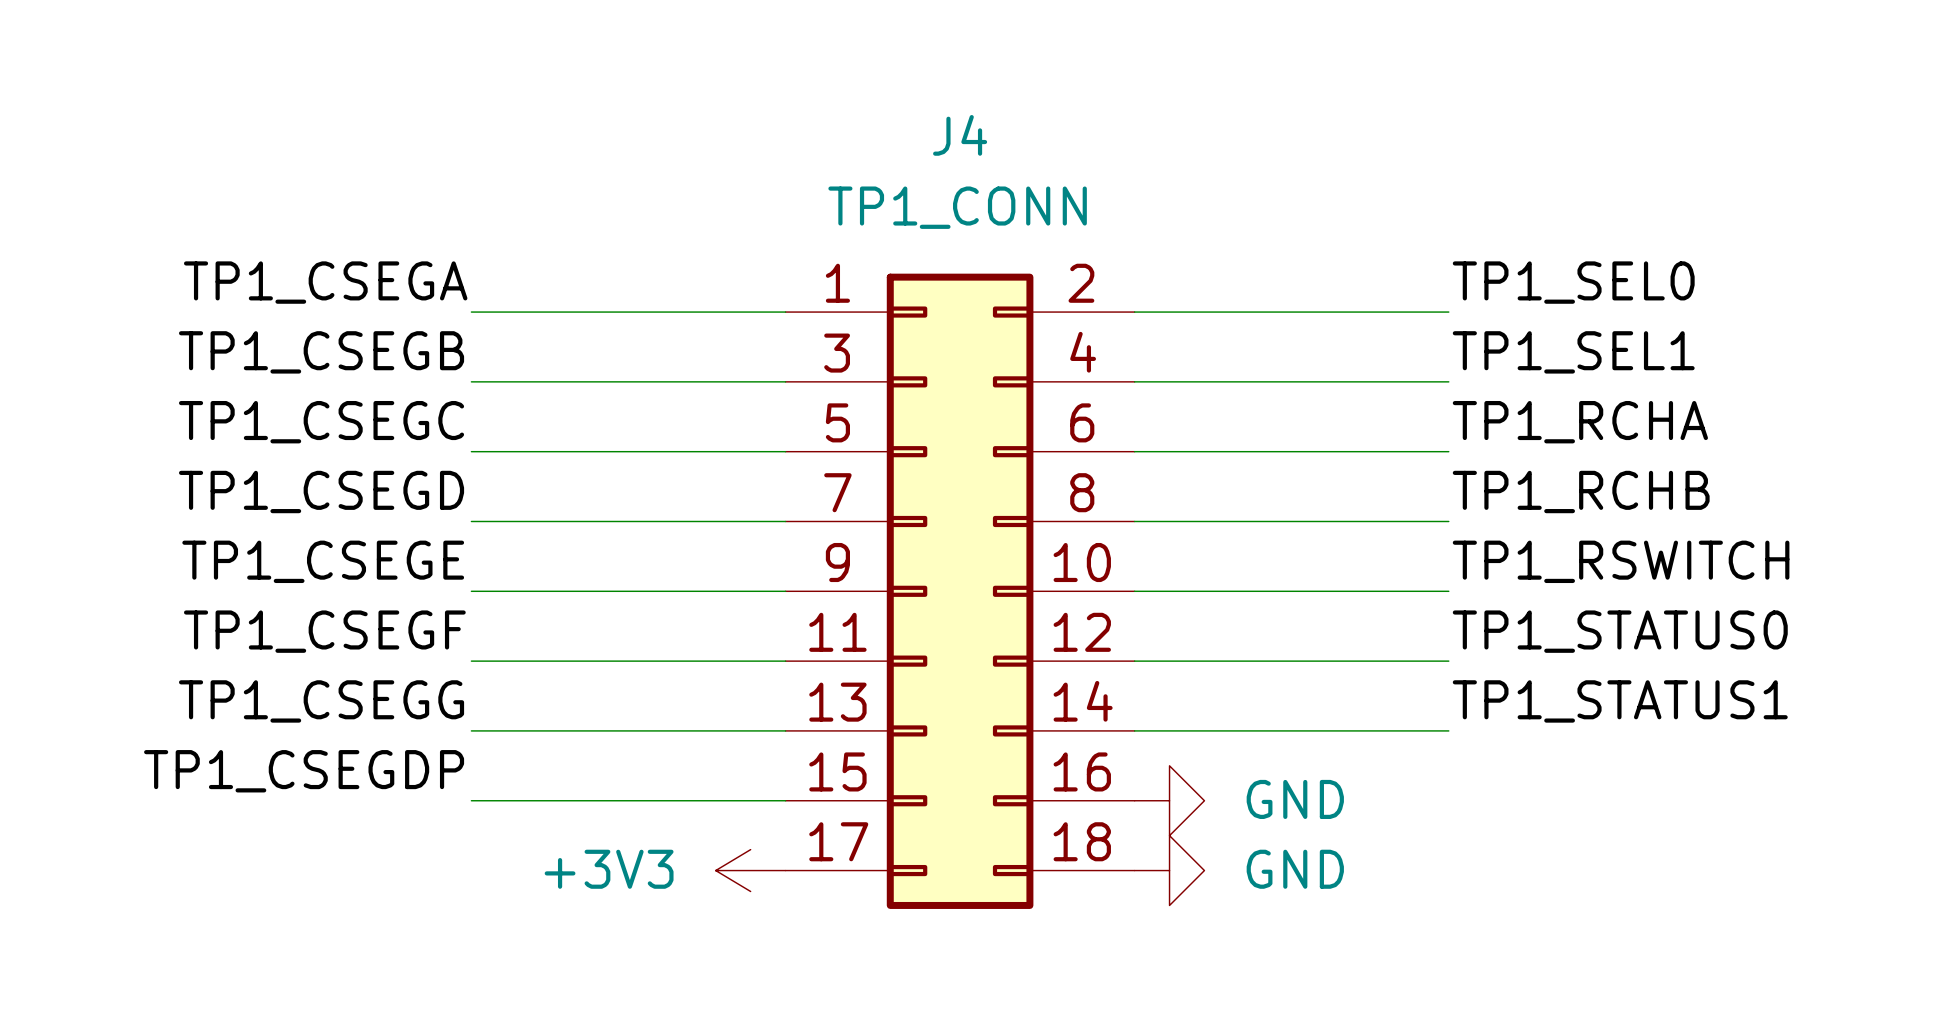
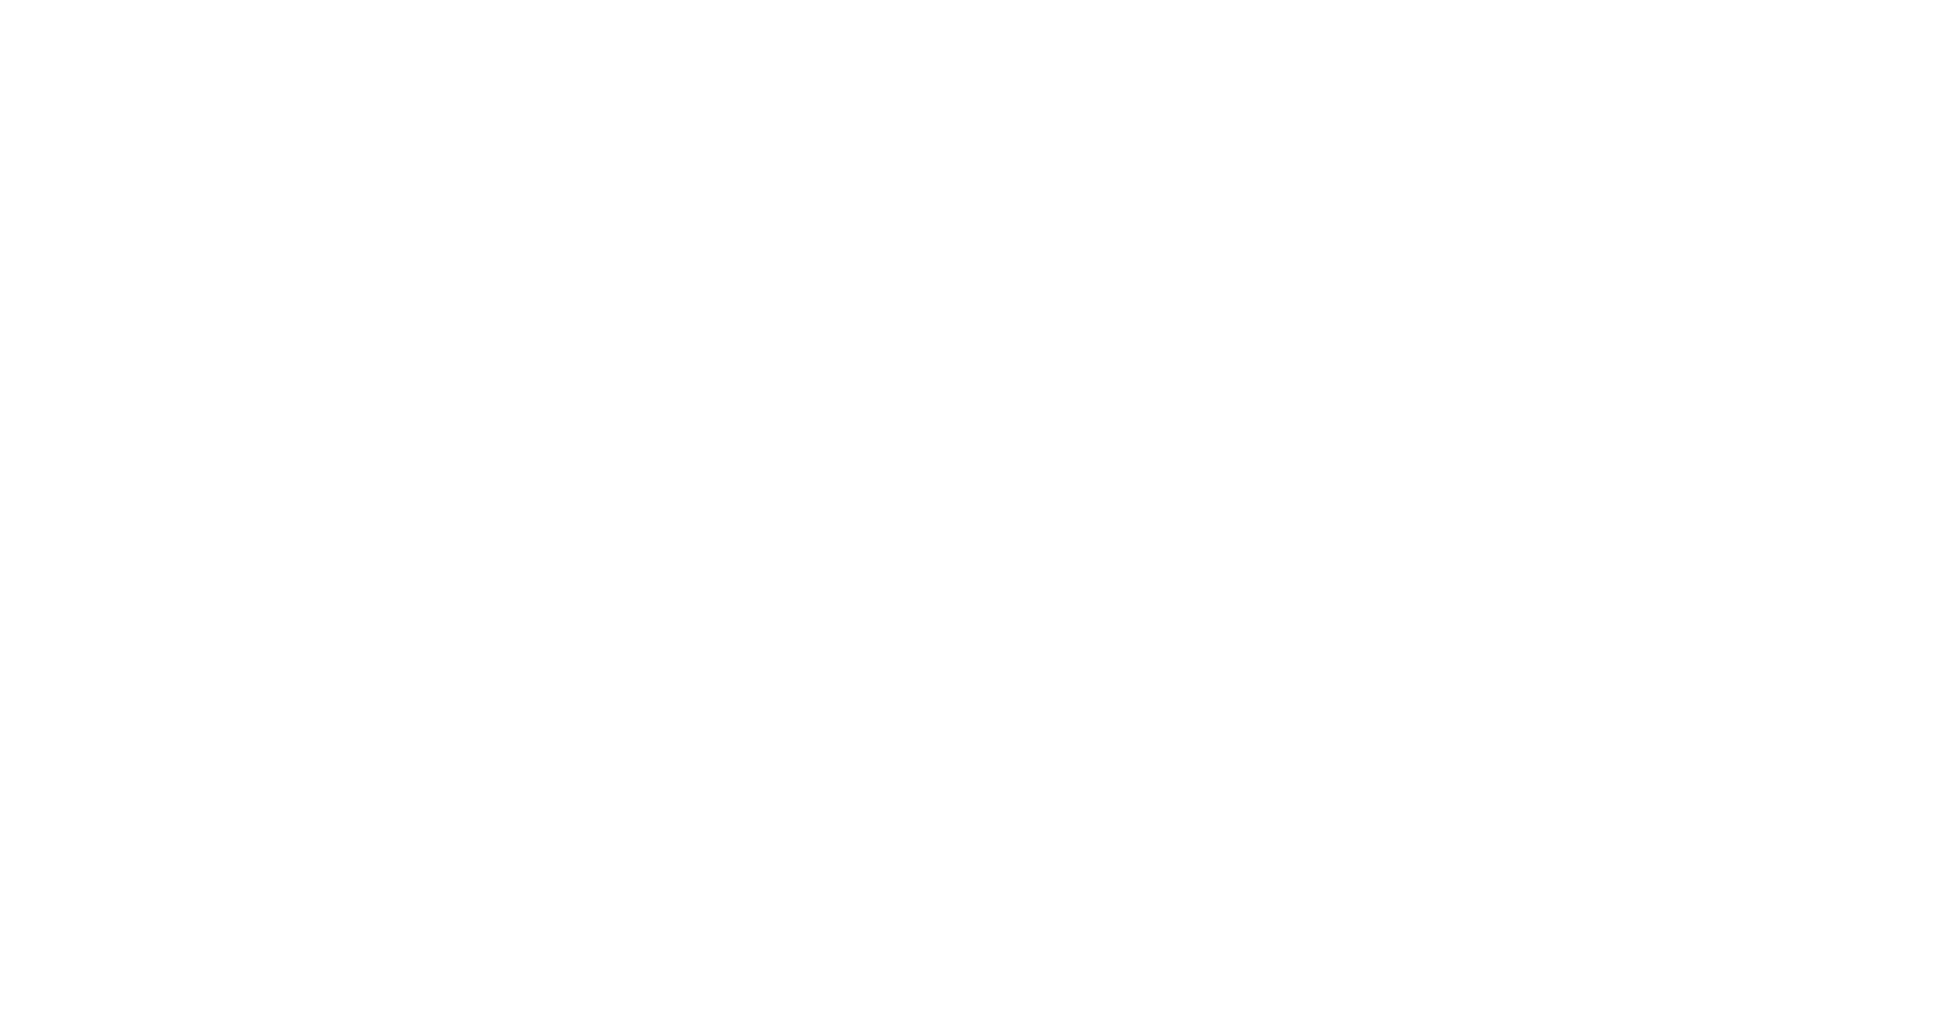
label: TP1_CSEGA (325, 282) -> none
label: TP1_SEL0 (1573, 282) -> none
wire: (471, 312) (785, 312) -> none
wire: (1134, 312) (1448, 312) -> none
label: TP1_CSEGB (321, 352) -> none
label: TP1_SEL1 (1573, 352) -> none
wire: (471, 381) (785, 381) -> none
wire: (1134, 381) (1448, 381) -> none
label: TP1_CSEGC (321, 422) -> none
label: TP1_RCHA (1580, 422) -> none
wire: (471, 451) (785, 451) -> none
wire: (1134, 451) (1448, 451) -> none
label: TP1_CSEGD (321, 492) -> none
label: TP1_RCHB (1581, 492) -> none
wire: (471, 521) (785, 521) -> none
wire: (1134, 521) (1448, 521) -> none
label: TP1_CSEGE (323, 561) -> none
label: TP1_RSWITCH (1621, 561) -> none
wire: (471, 591) (785, 591) -> none
J4: TP1_CONN (960, 591) -> none
wire: (1134, 591) (1448, 591) -> none
label: TP1_CSEGF (324, 631) -> none
label: TP1_STATUS0 (1620, 631) -> none
wire: (471, 661) (785, 661) -> none
wire: (1134, 661) (1448, 661) -> none
label: TP1_CSEGG (321, 701) -> none
label: TP1_STATUS1 (1620, 701) -> none
wire: (471, 730) (785, 730) -> none
wire: (1134, 730) (1448, 730) -> none
label: TP1_CSEGDP (304, 771) -> none
wire: (471, 800) (785, 800) -> none
power symbol: GND (1169, 800) -> none
power symbol: +3V3 (750, 870) -> none
power symbol: GND (1169, 870) -> none

